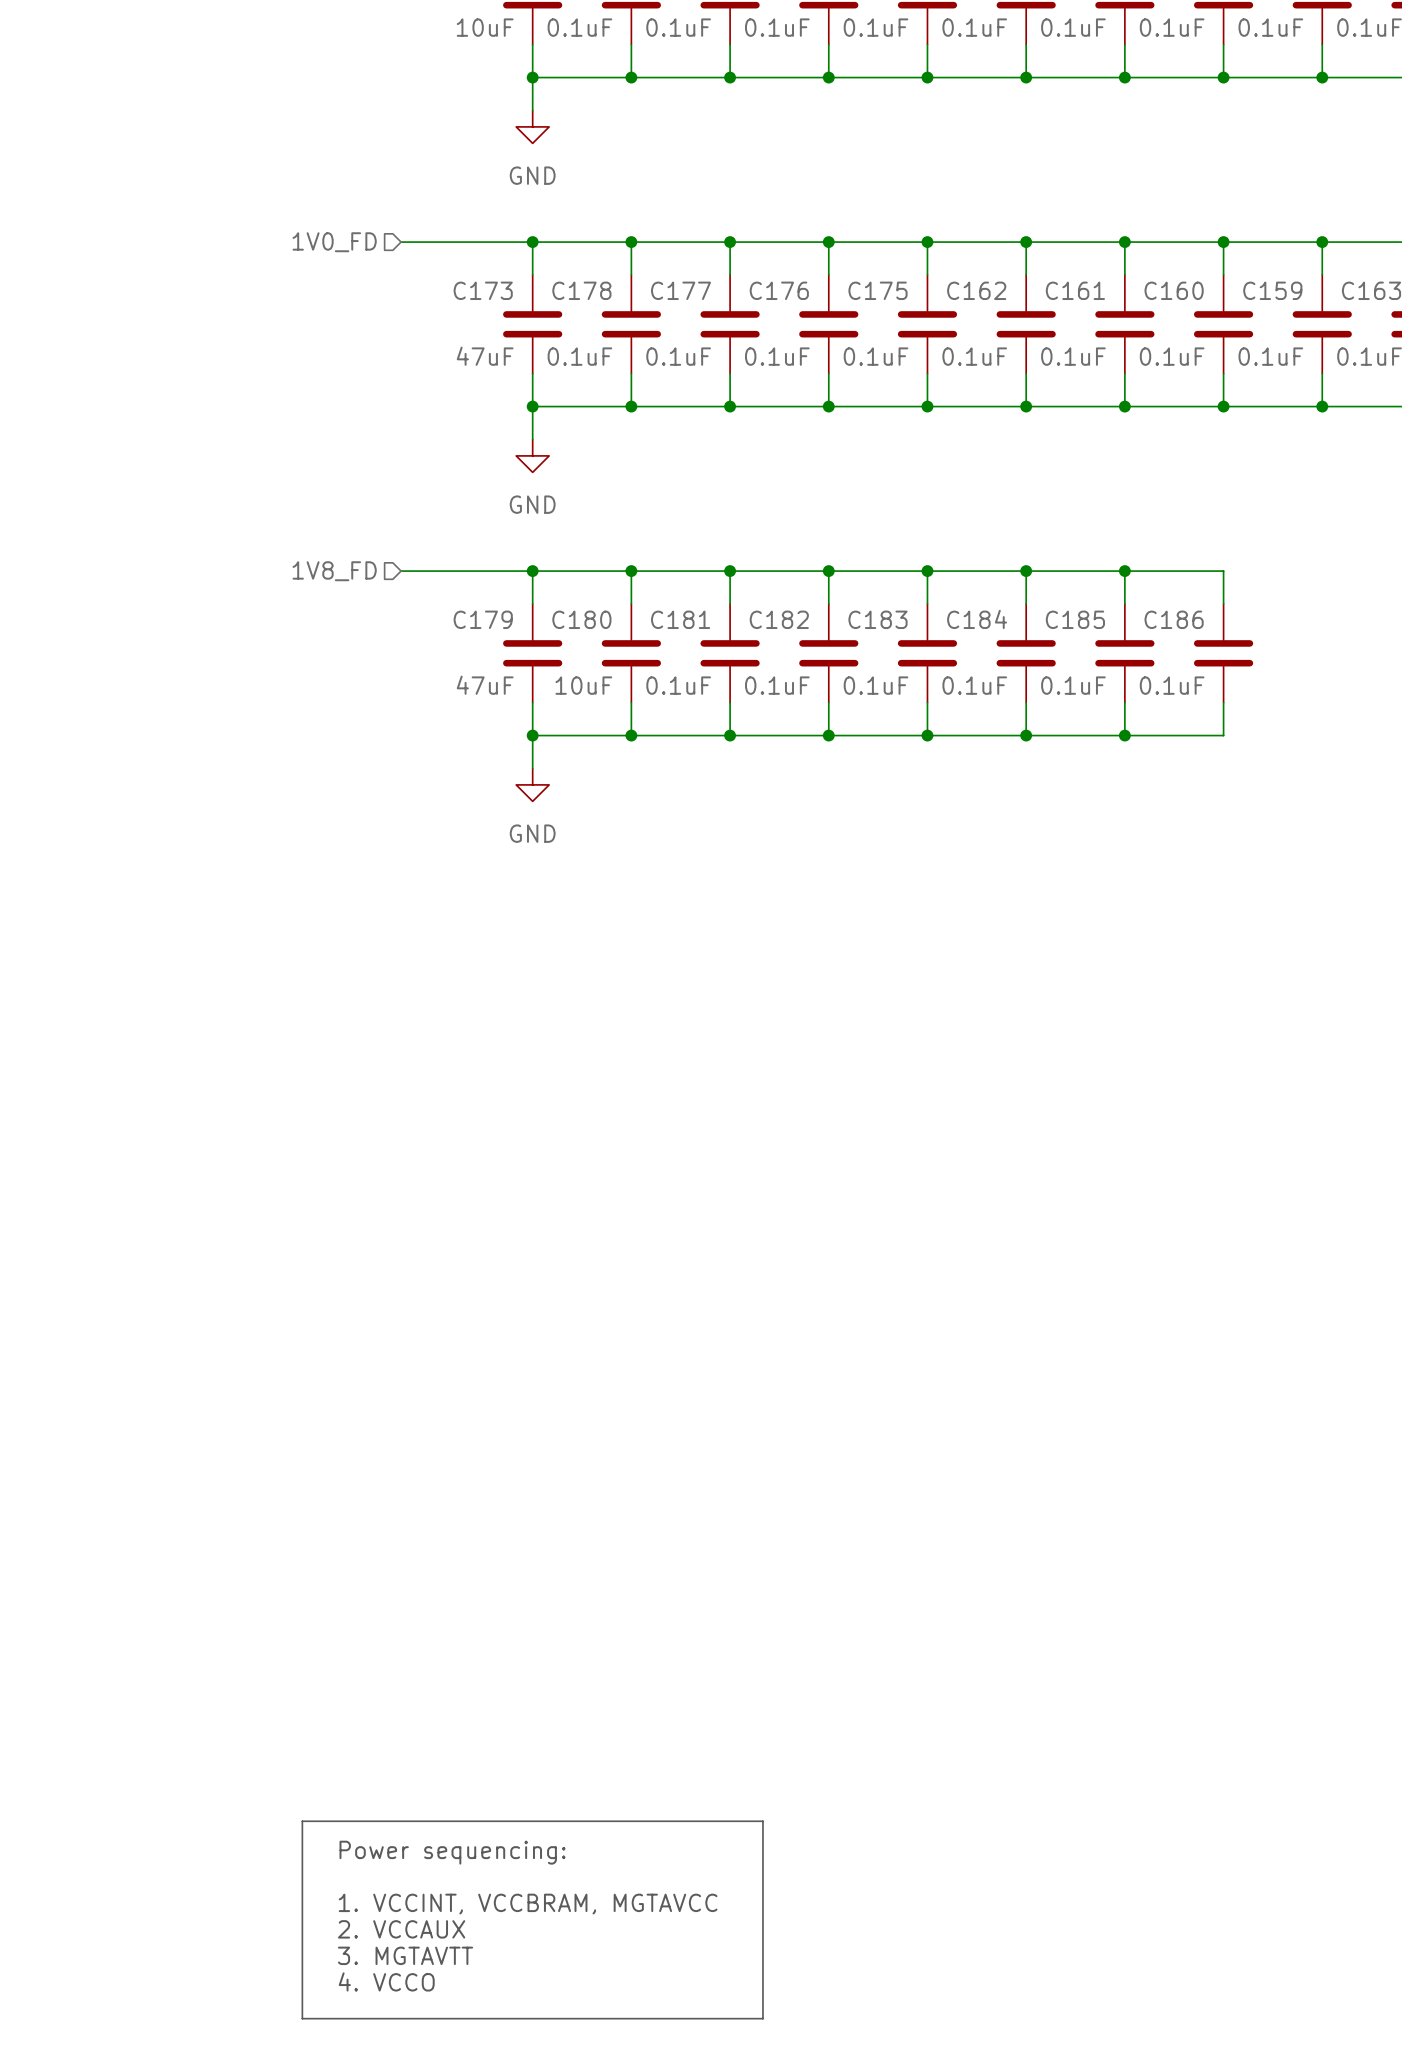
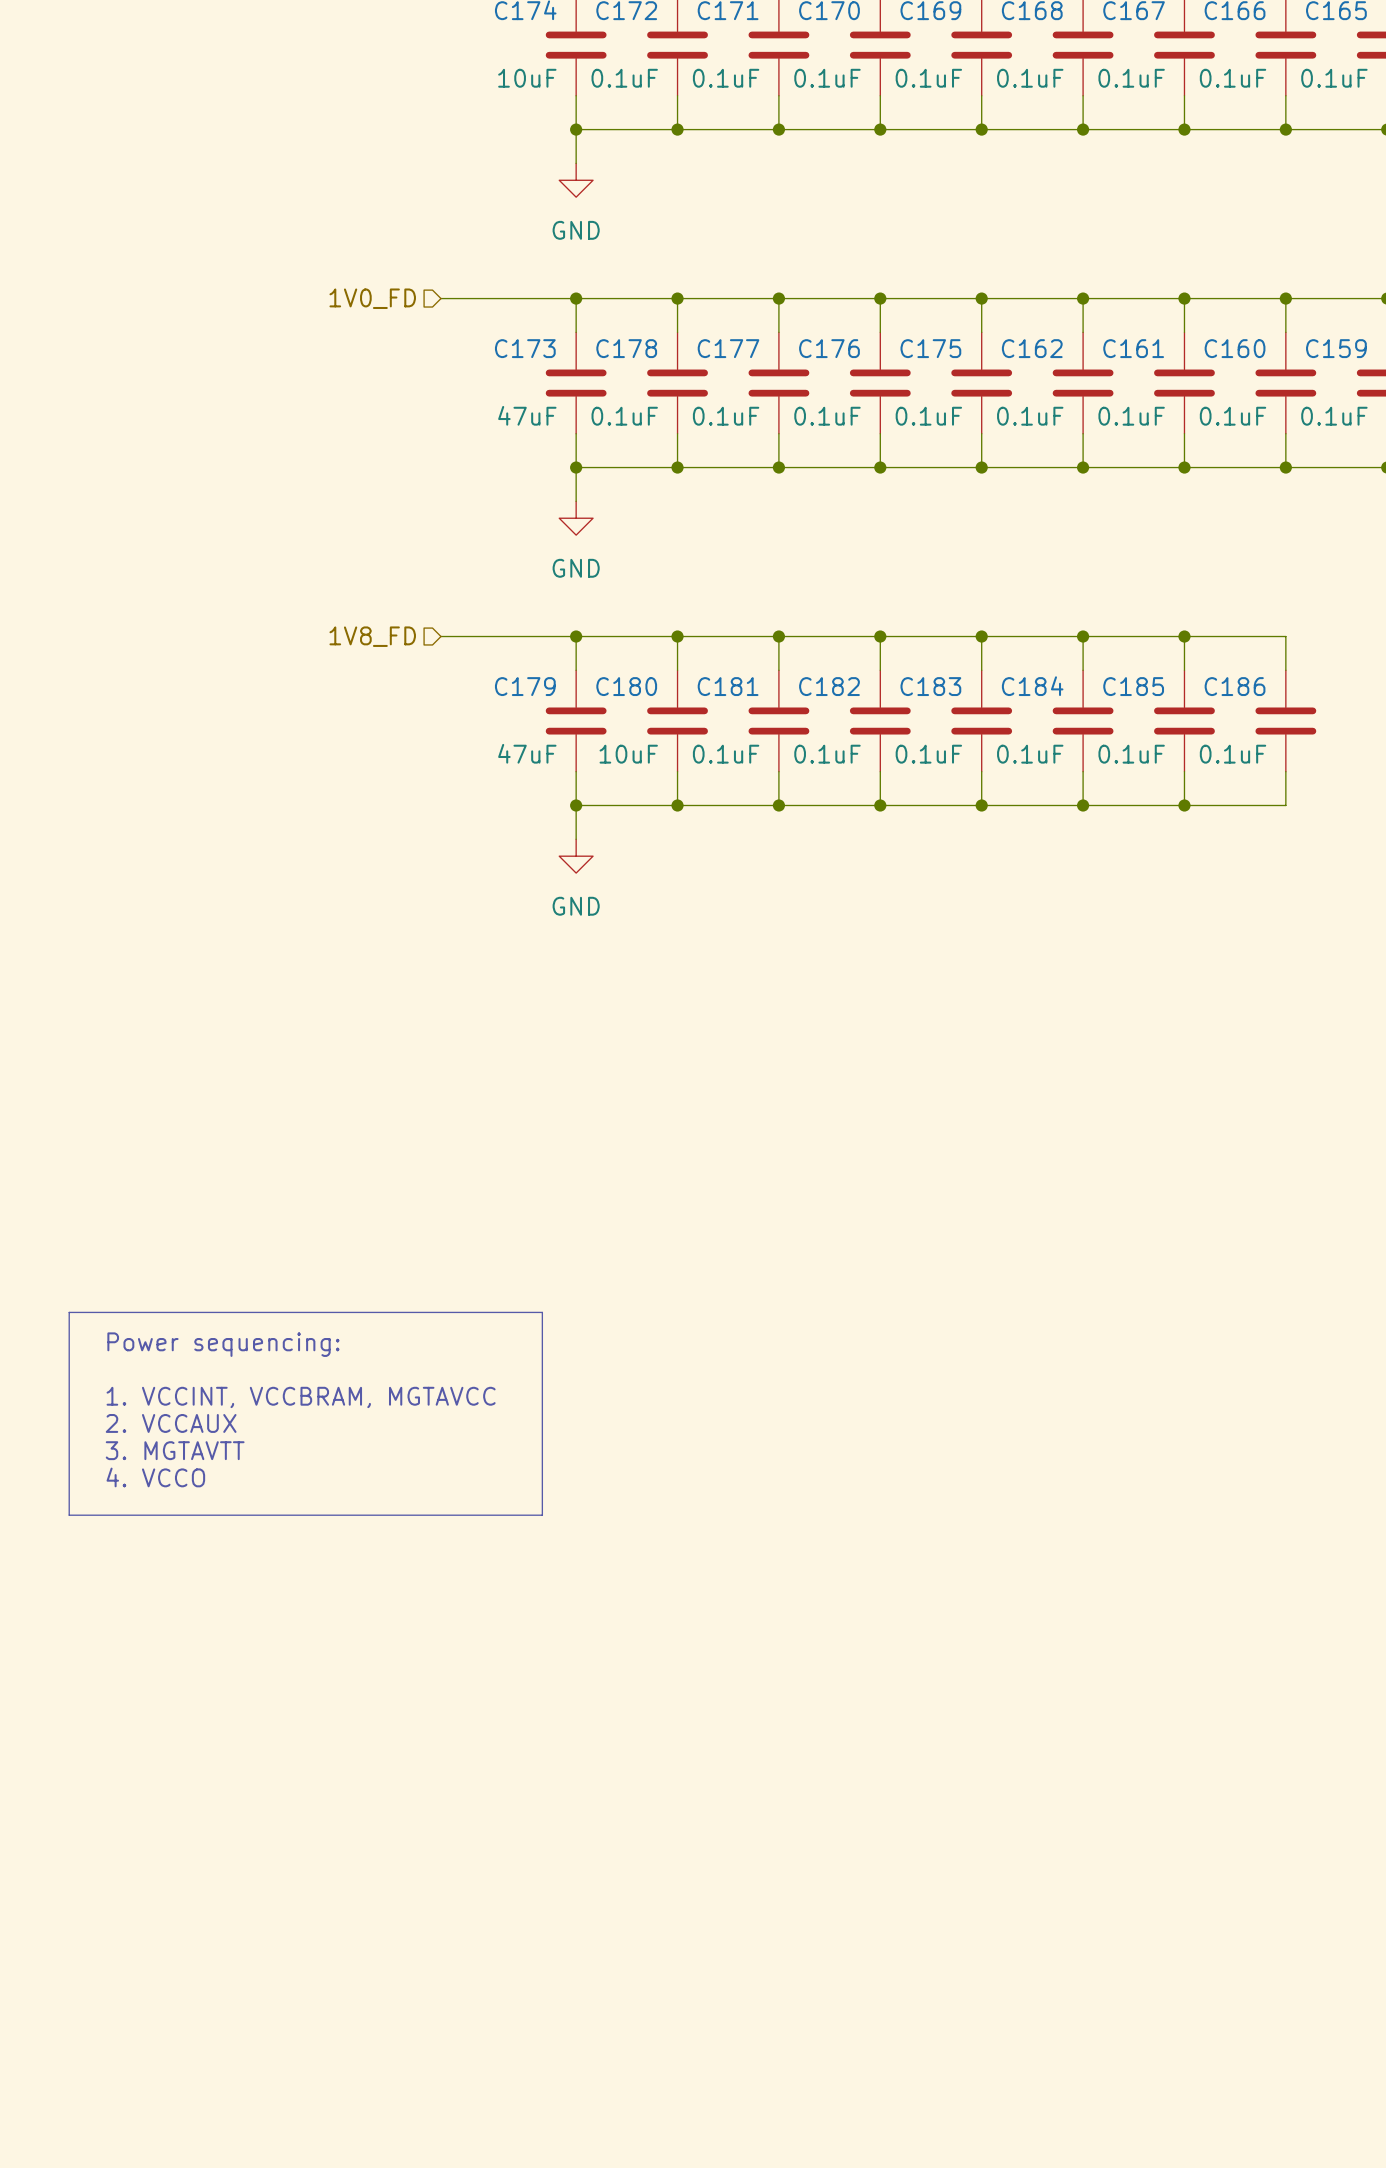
line: none -> (69, 1312) (542, 1312) (542, 1515) (69, 1515) (69, 1312)
text: none -> Power sequencing: (223, 1344)
text: none -> 1. VCCINT, VCCBRAM, MGTAVCC (301, 1397)
text: none -> 2. VCCAUX (171, 1423)
text: none -> 3. MGTAVTT (175, 1450)
text: none -> 4. VCCO (155, 1477)
line: (302, 1821) (762, 1821) (762, 2018) (302, 2018) (302, 1821) -> none
text: Power sequencing: (452, 1852) -> none
text: 1. VCCINT, VCCBRAM, MGTAVCC (528, 1904) -> none
text: 2. VCCAUX (401, 1929) -> none
text: 3. MGTAVTT (405, 1955) -> none
text: 4. VCCO (386, 1981) -> none

